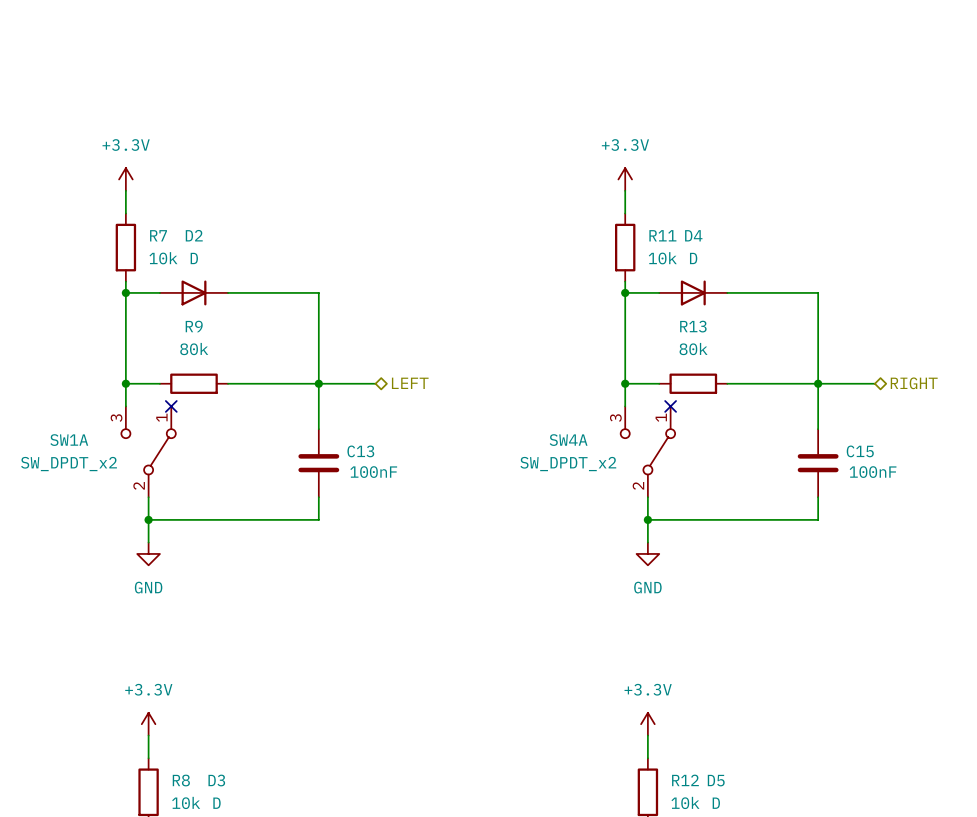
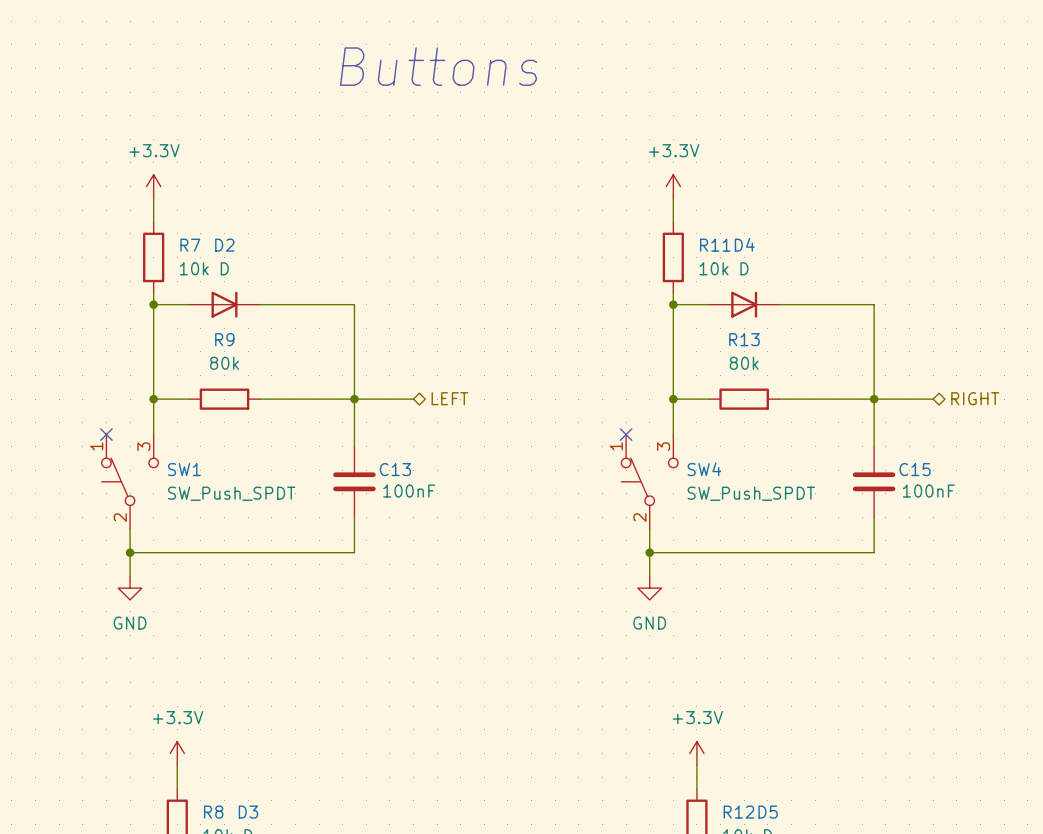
text: none -> Buttons (438, 66)
no-connect mark: (171, 406) -> none
no-connect mark: (670, 406) -> none
no-connect mark: none -> (106, 434)
no-connect mark: none -> (626, 434)
SW1A: SW_DPDT_x2 (148, 451) -> none
SW4A: SW_DPDT_x2 (647, 451) -> none
SW1: none -> SW_Push_SPDT (130, 481)
SW4: none -> SW_Push_SPDT (649, 481)
wire: (148, 497) (148, 542) -> (130, 529) (130, 576)
wire: (647, 497) (647, 542) -> (649, 529) (649, 576)
wire: (148, 519) (318, 519) -> (130, 552) (354, 552) (354, 540)
junction position: (148, 519) -> (130, 552)
wire: (647, 519) (818, 519) -> (649, 552) (874, 552) (874, 540)
junction position: (647, 519) -> (649, 552)
power symbol position: GND (148, 553) -> GND (130, 588)
power symbol position: GND (647, 553) -> GND (649, 588)

